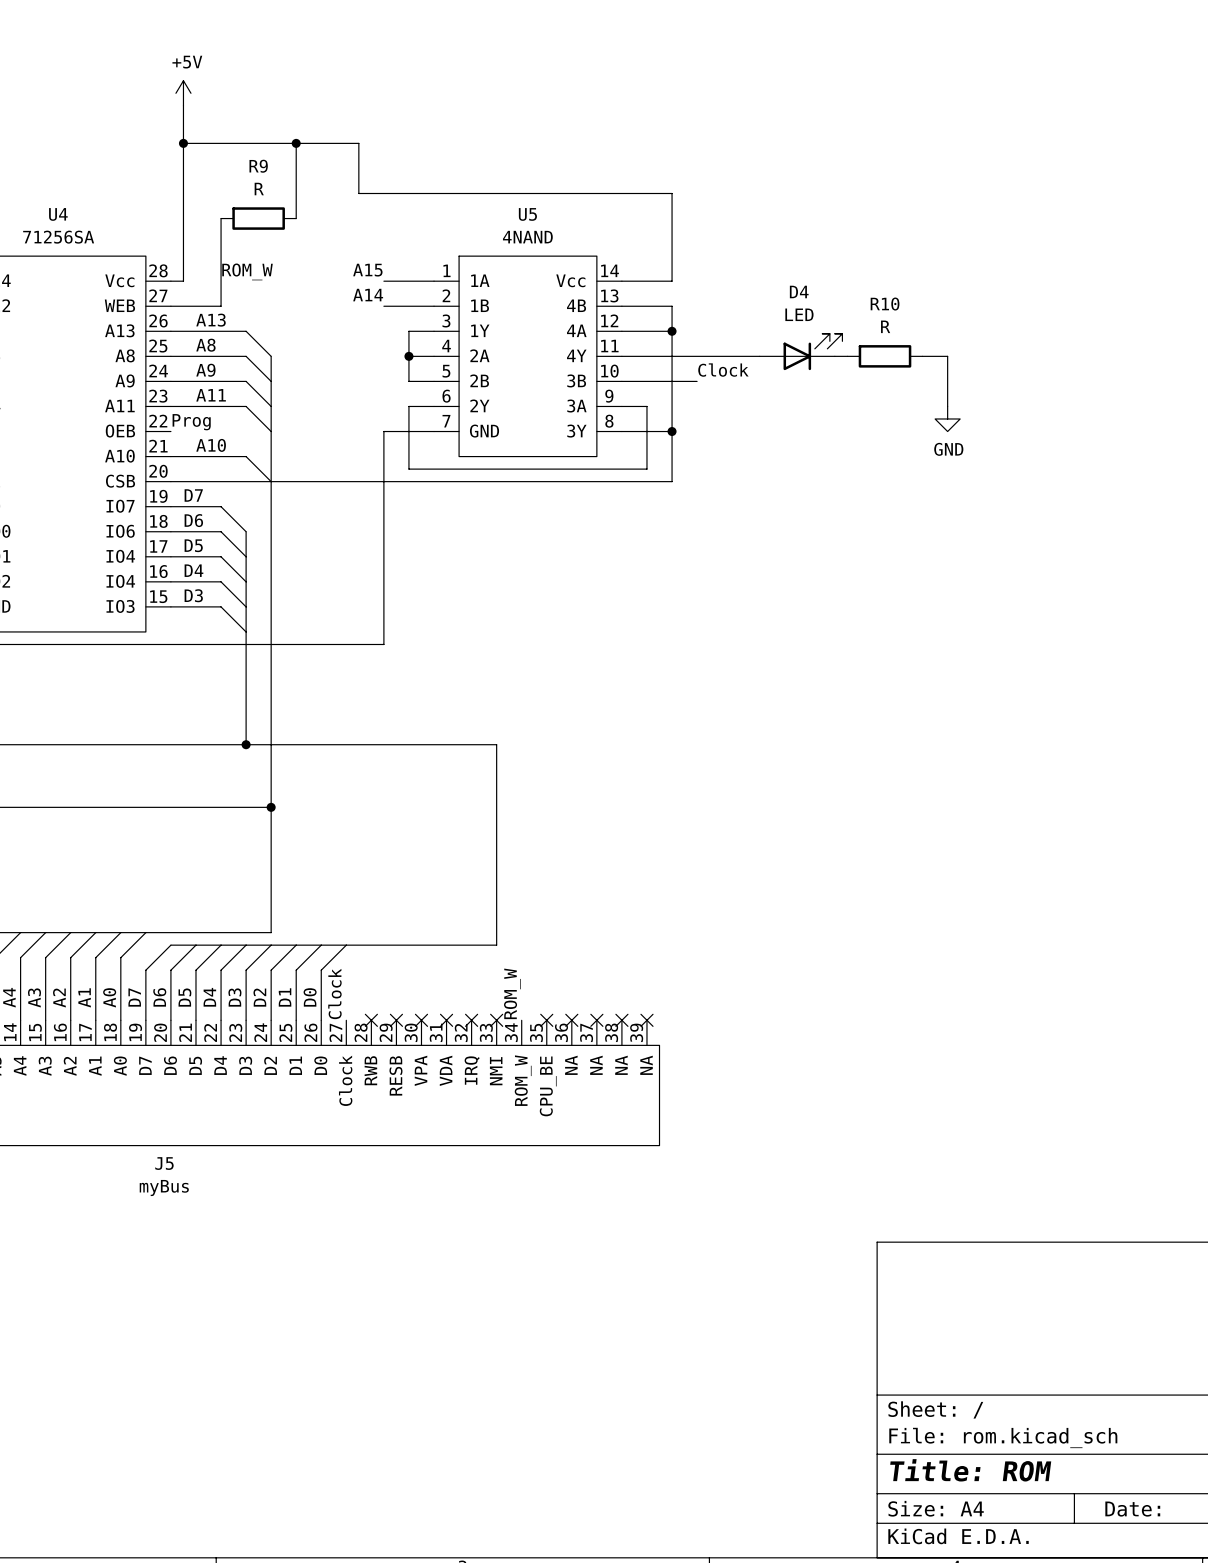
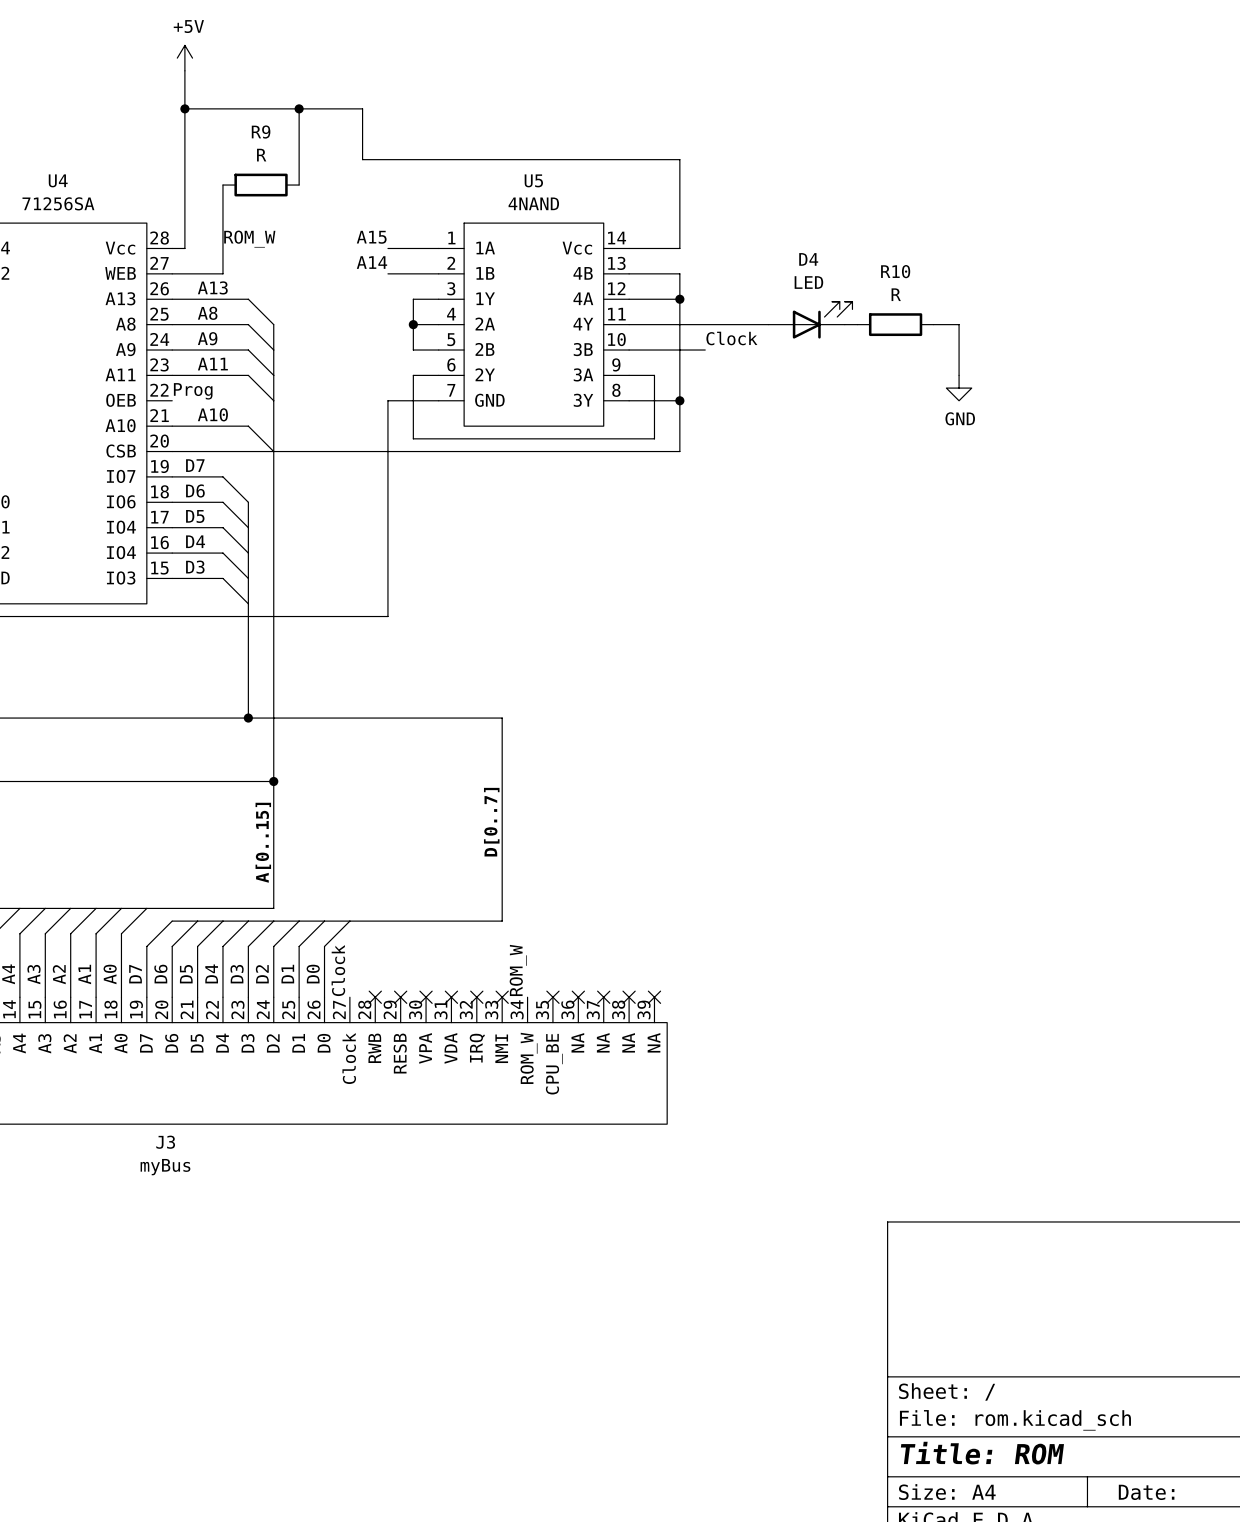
label: none -> D[0..7] (491, 822)
label: none -> A[0..15] (263, 842)
J5 name: J5 (164, 1163) -> J3 (165, 1142)

